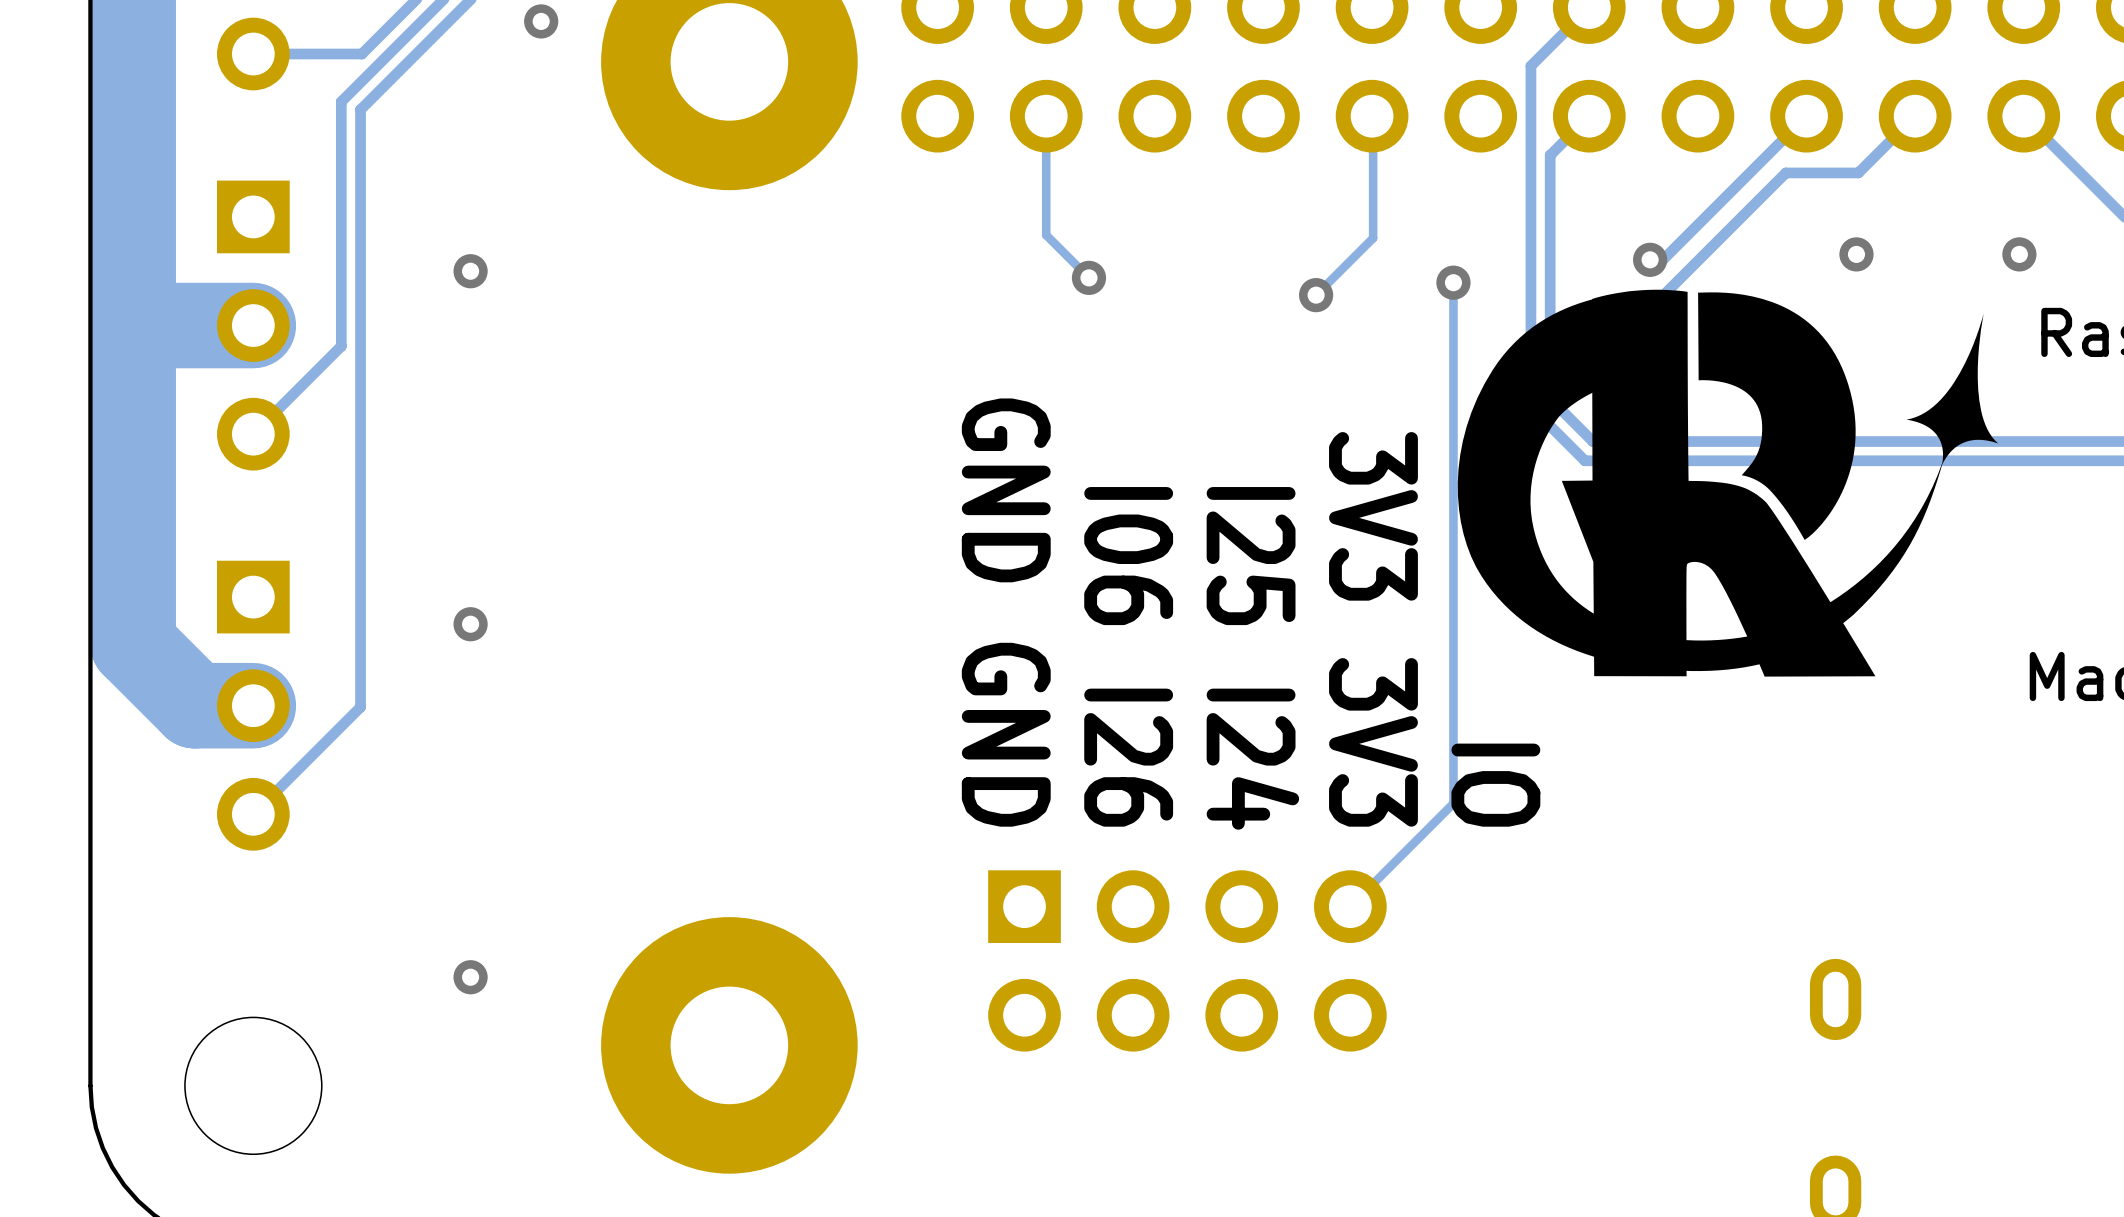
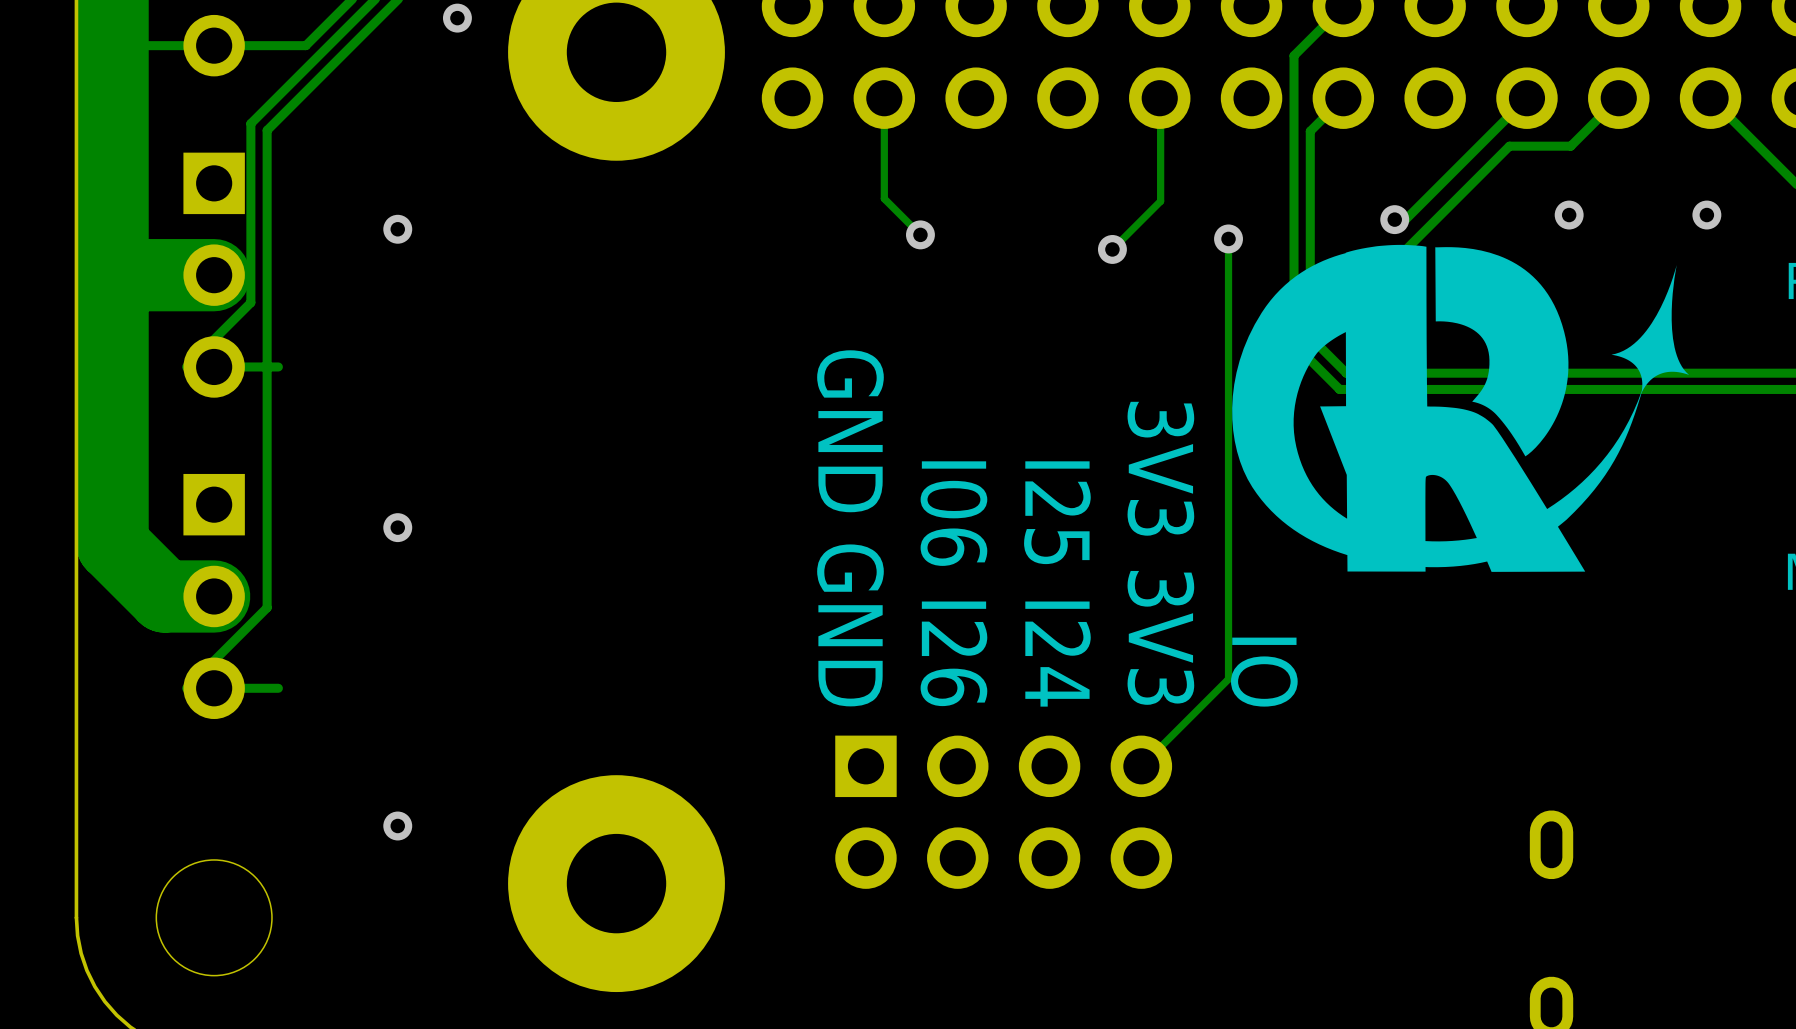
track: none -> (214, 45) (122, 45)
track: (341, 101) (341, 346) (253, 434) -> (288, 86) (250, 123) (250, 302) (186, 366)
track: (360, 109) (360, 707) (253, 814) -> (304, 92) (267, 130) (267, 607) (186, 688)
track: none -> (278, 366) (214, 366)
track: none -> (278, 688) (214, 688)

